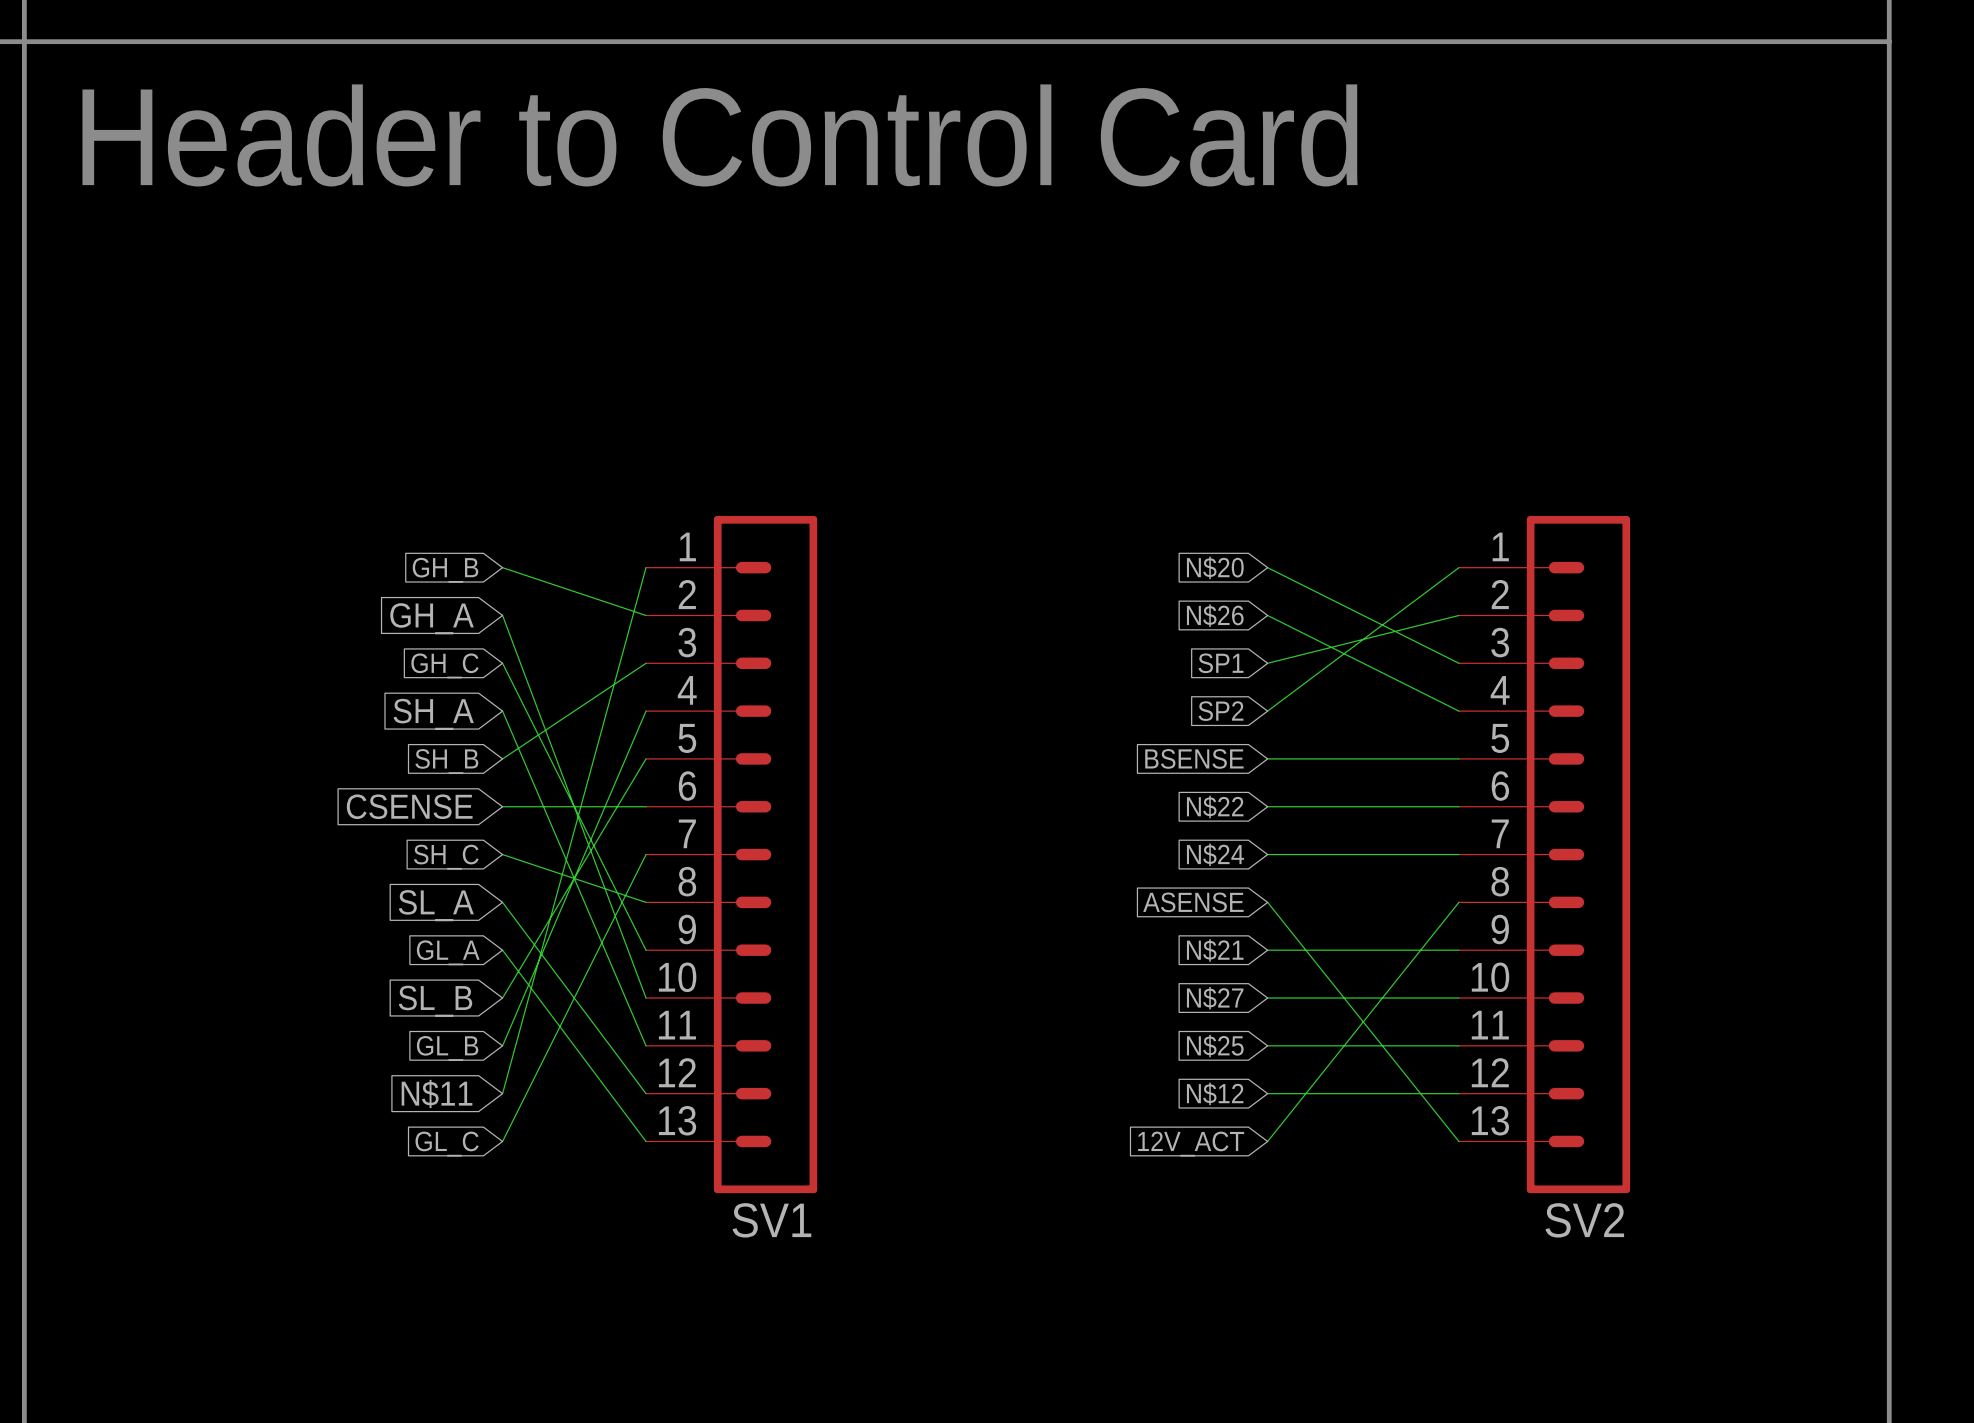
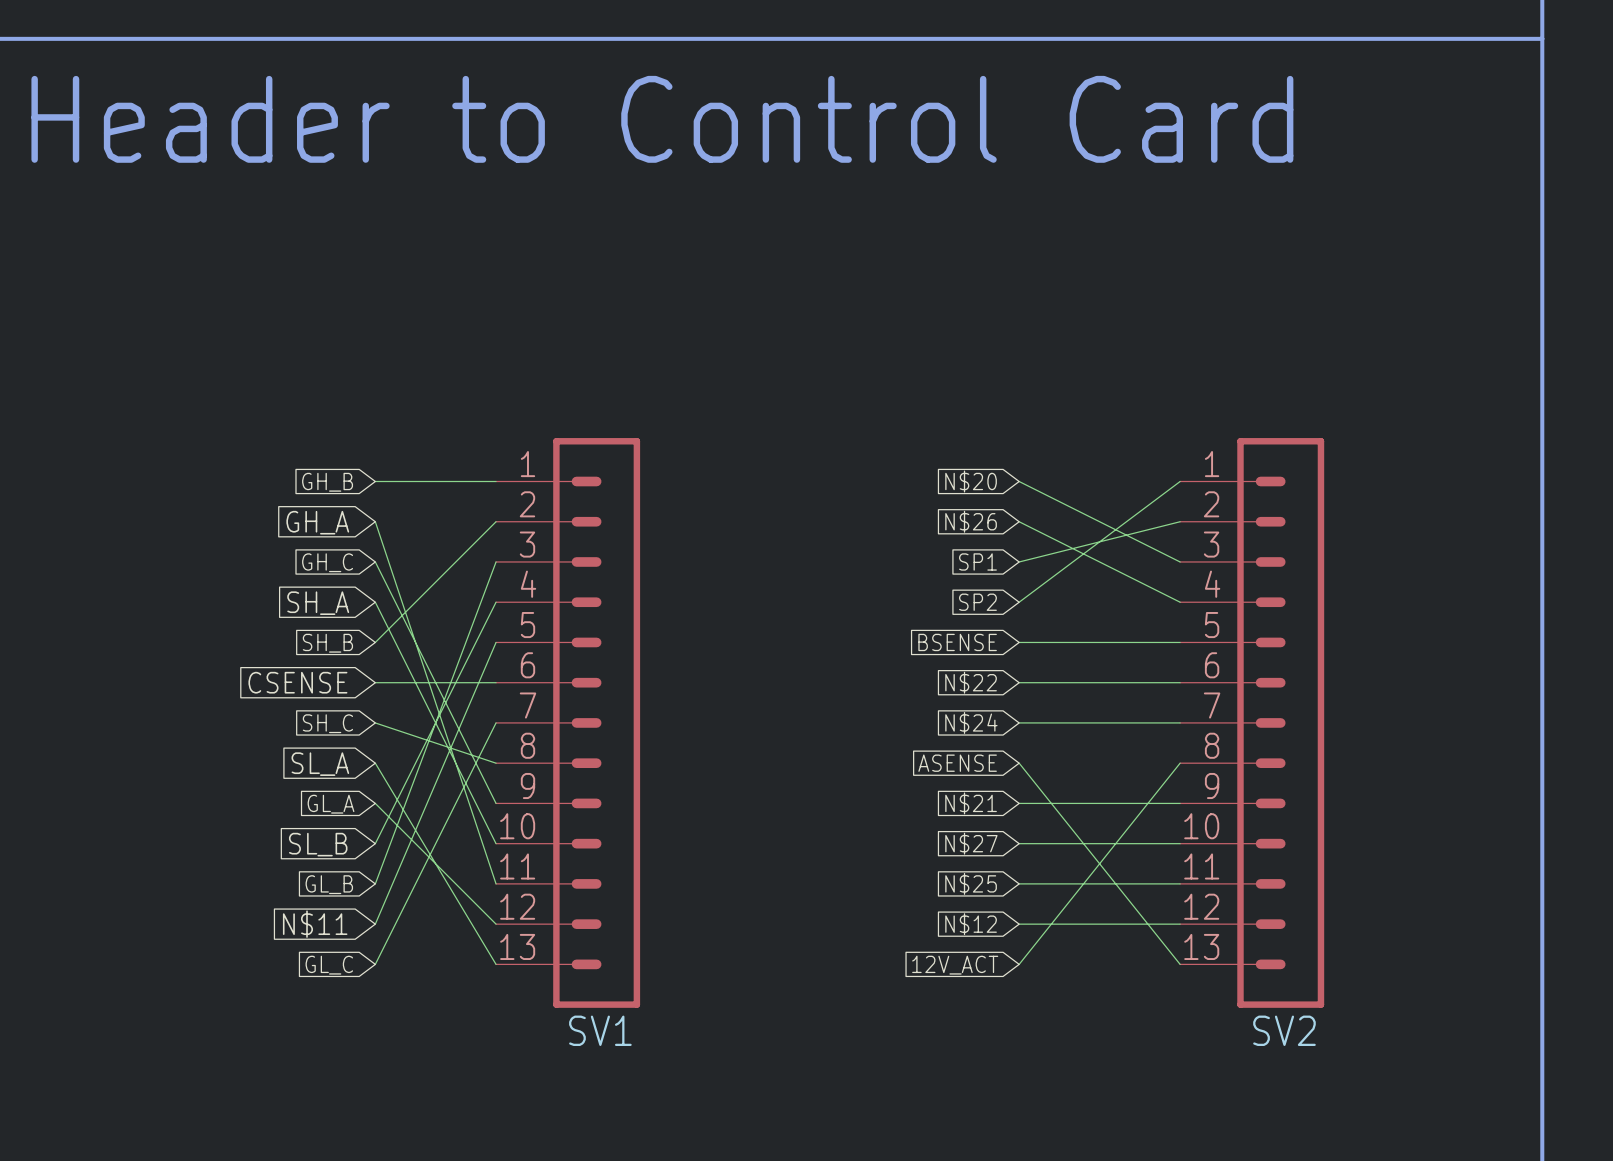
wire: (502, 567) (646, 615) -> (375, 481) (496, 481)
wire: (646, 567) (502, 1093) -> (496, 642) (375, 924)
wire: (502, 615) (646, 998) -> (375, 521) (496, 883)
wire: (646, 663) (502, 758) -> (496, 521) (375, 642)
wire: (502, 711) (646, 1045) -> (375, 602) (496, 843)
wire: (646, 711) (502, 1045) -> (496, 561) (375, 883)
wire: (646, 758) (502, 998) -> (496, 602) (375, 843)
wire: (502, 902) (646, 1093) -> (375, 763) (496, 964)
wire: (502, 950) (646, 1141) -> (375, 803) (496, 924)

